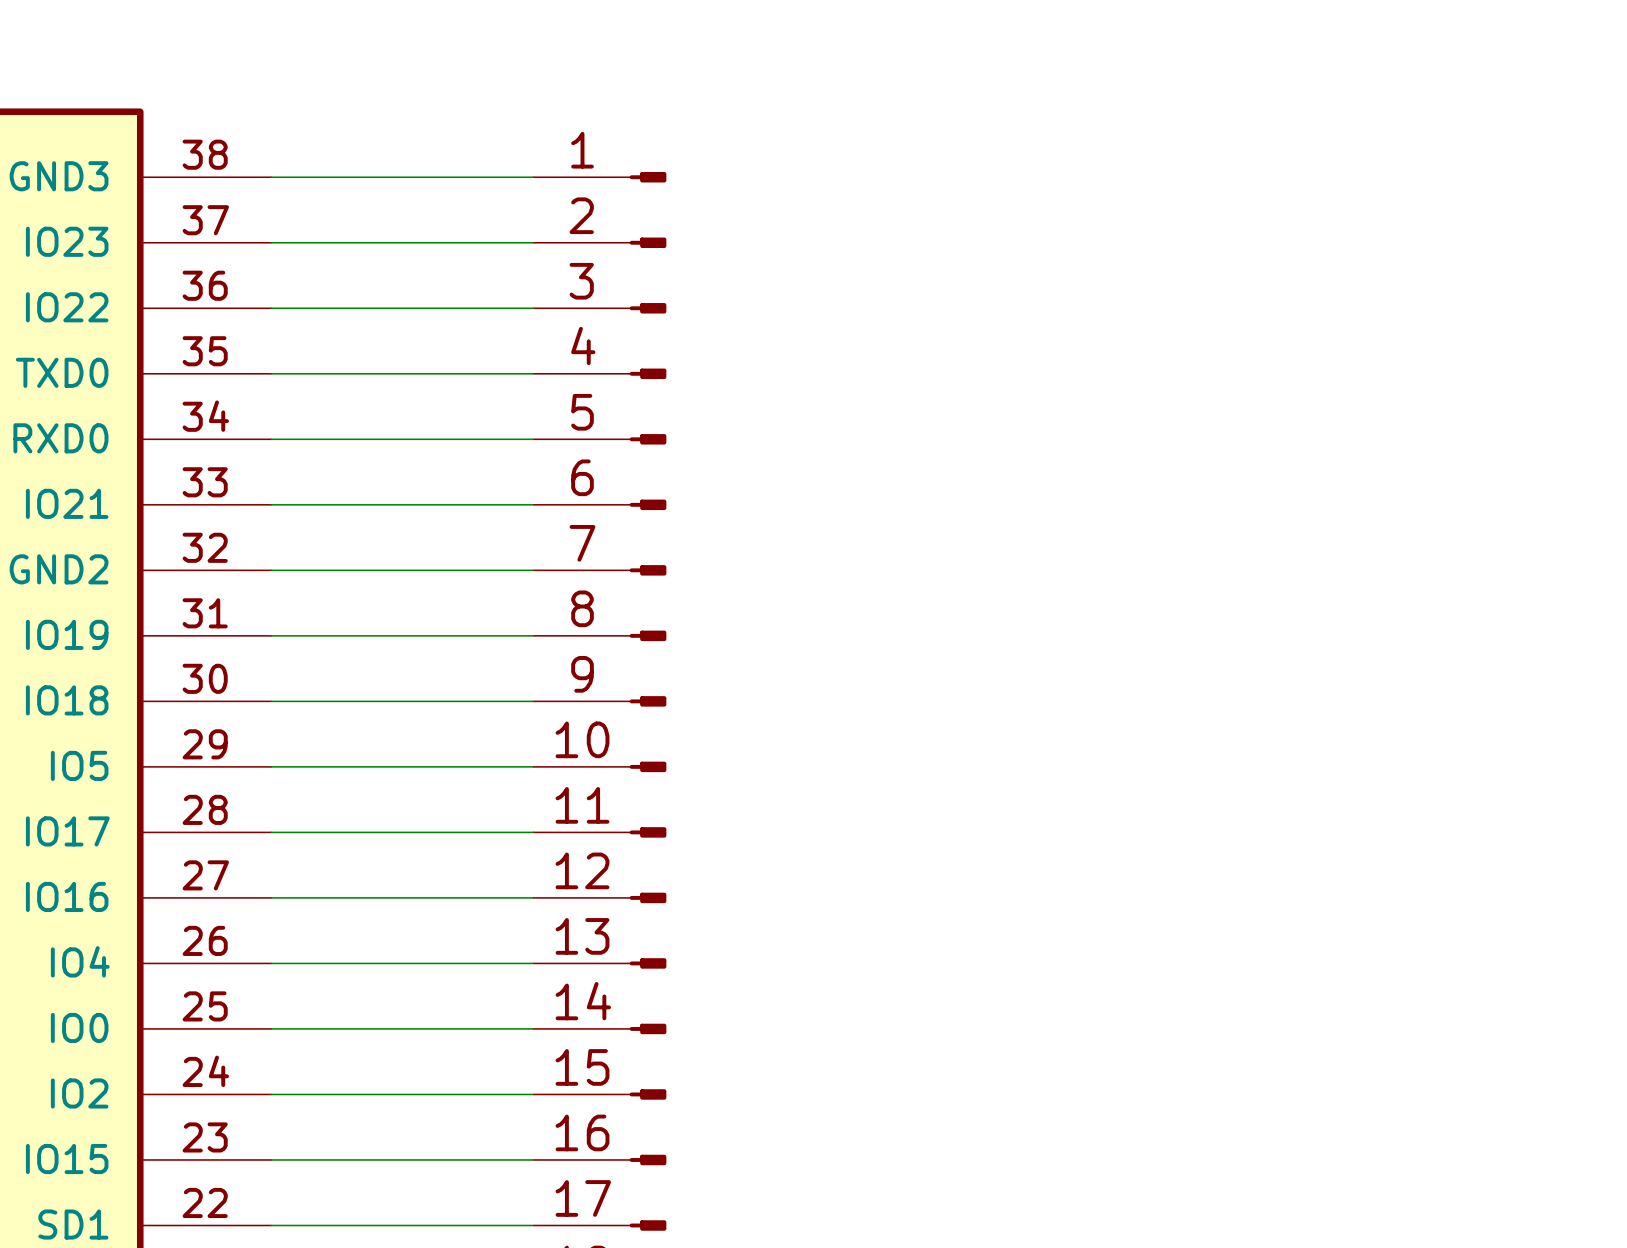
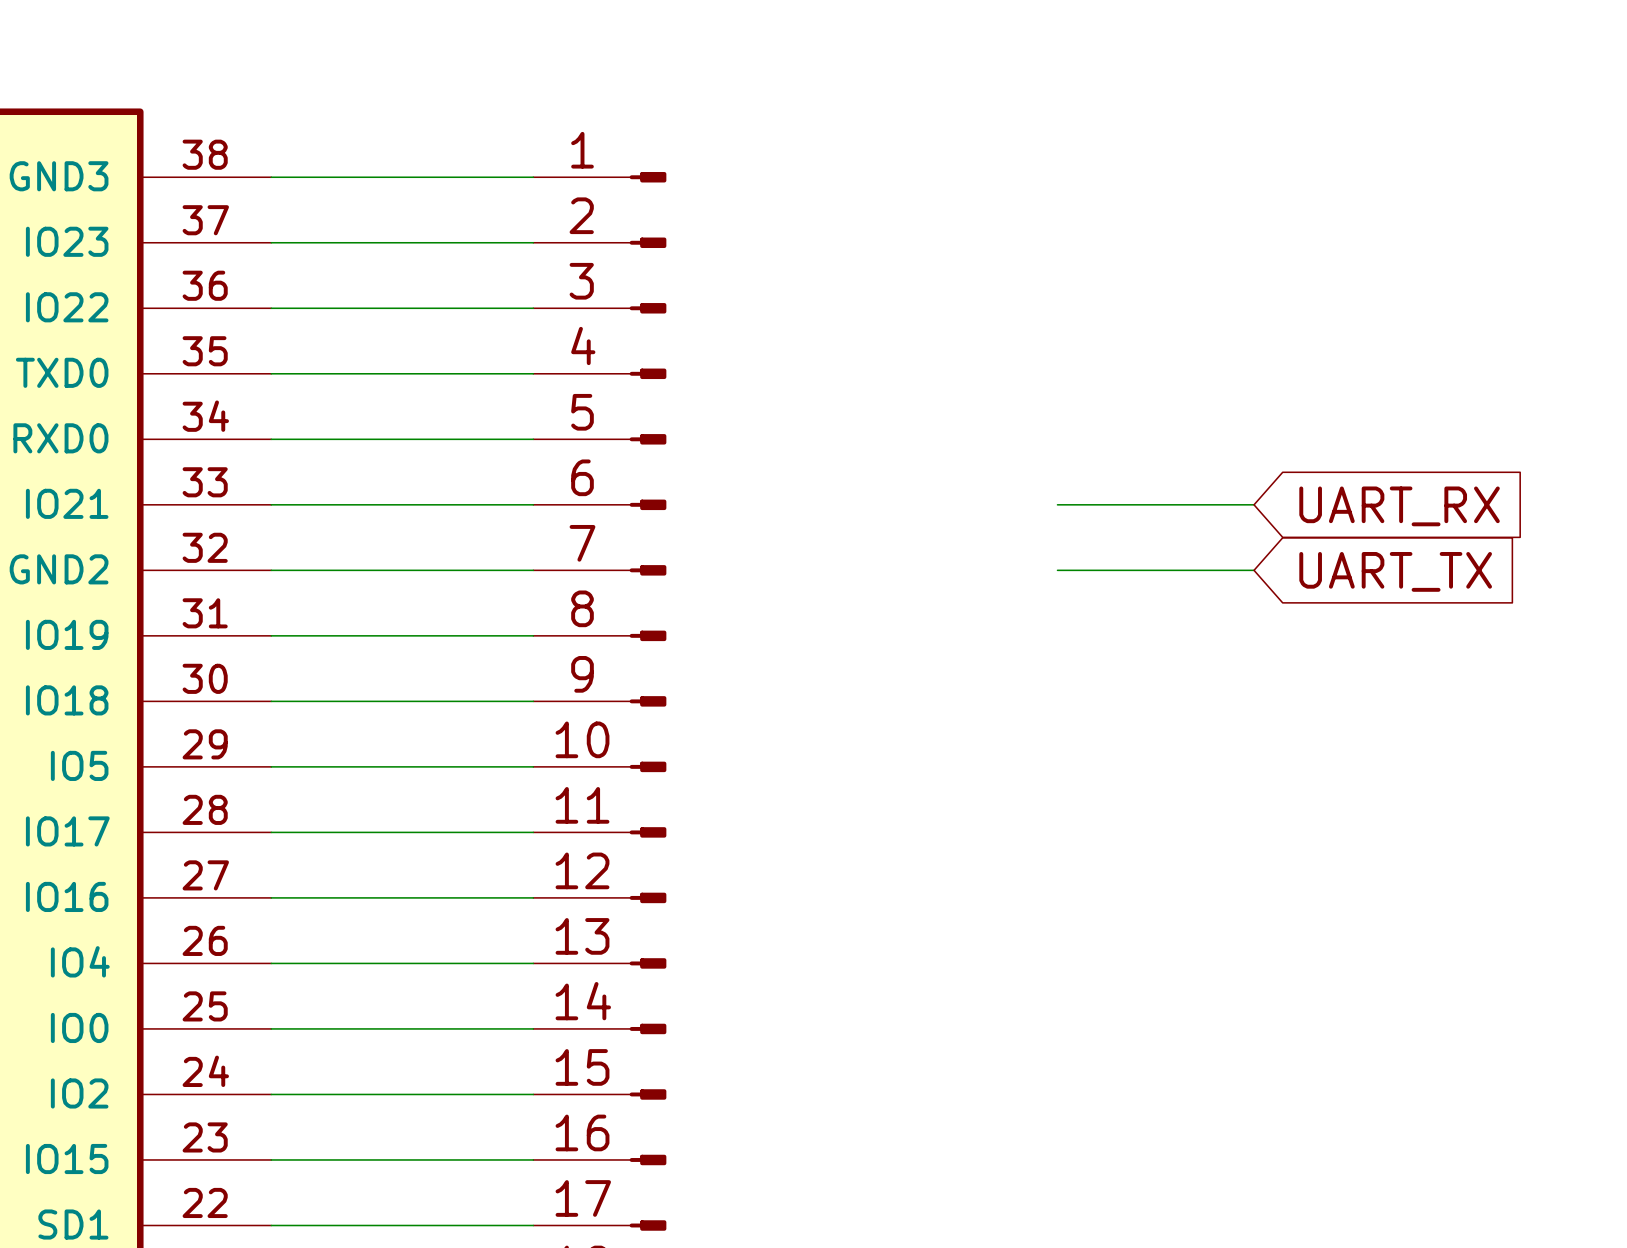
wire: none -> (1057, 504) (1254, 504)
global label: none -> UART_RX (1399, 506)
wire: none -> (1057, 570) (1254, 570)
global label: none -> UART_TX (1395, 571)

